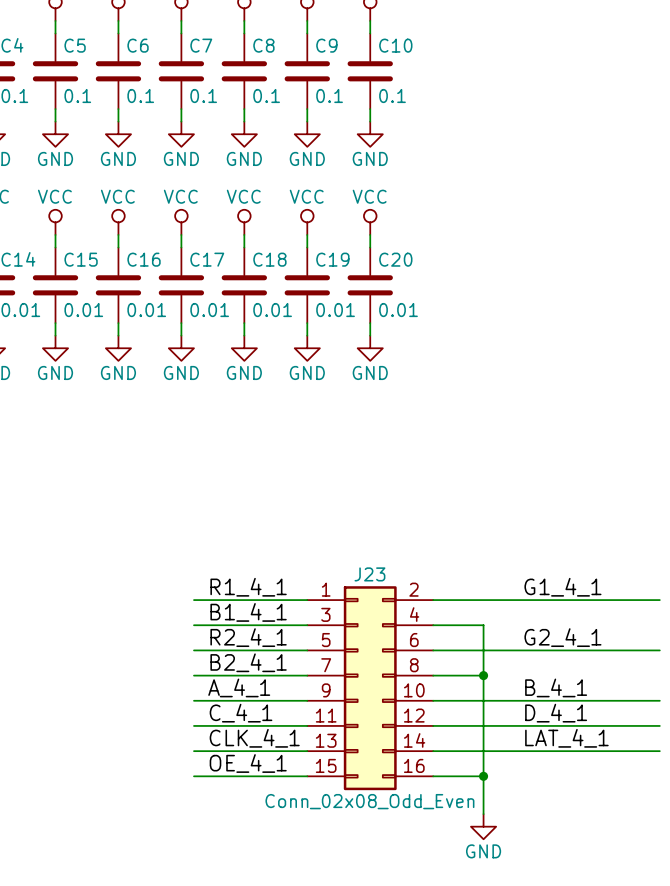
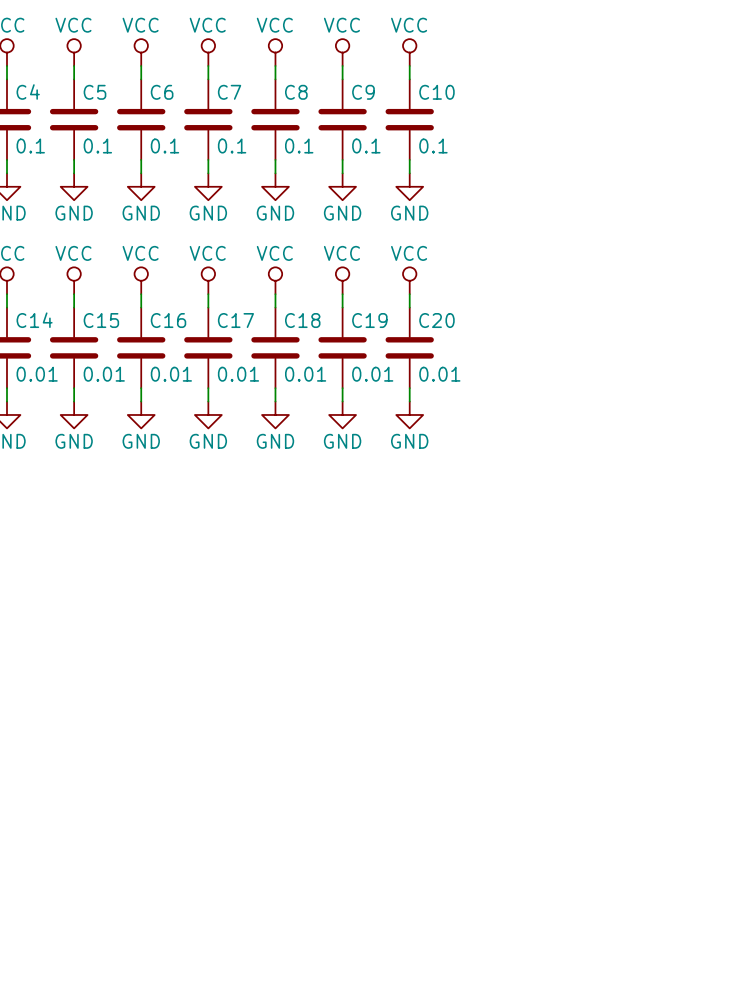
label: R1_4_1 (248, 587) -> none
label: G1_4_1 (562, 587) -> none
wire: (193, 600) (307, 600) -> none
wire: (433, 600) (659, 600) -> none
label: B1_4_1 (248, 612) -> none
wire: (193, 625) (307, 625) -> none
wire: (433, 625) (483, 625) (483, 814) -> none
label: R2_4_1 (248, 637) -> none
label: G2_4_1 (562, 637) -> none
wire: (193, 650) (307, 650) -> none
wire: (433, 650) (659, 650) -> none
label: B2_4_1 (248, 662) -> none
wire: (193, 675) (307, 675) -> none
wire: (433, 675) (483, 675) -> none
junction: (483, 675) -> none
label: A_4_1 (239, 687) -> none
label: B_4_1 (556, 687) -> none
J23: Conn_02x08_Odd_Even (370, 688) -> none
wire: (193, 700) (307, 700) -> none
wire: (433, 700) (659, 700) -> none
label: C_4_1 (241, 713) -> none
label: D_4_1 (556, 713) -> none
wire: (193, 725) (307, 725) -> none
wire: (433, 725) (659, 725) -> none
label: CLK_4_1 (254, 738) -> none
label: LAT_4_1 (566, 738) -> none
wire: (193, 751) (307, 751) -> none
wire: (433, 751) (659, 751) -> none
label: OE_4_1 (248, 763) -> none
wire: (193, 776) (307, 776) -> none
wire: (433, 776) (483, 776) -> none
junction: (483, 776) -> none
power symbol: GND (483, 826) -> none

